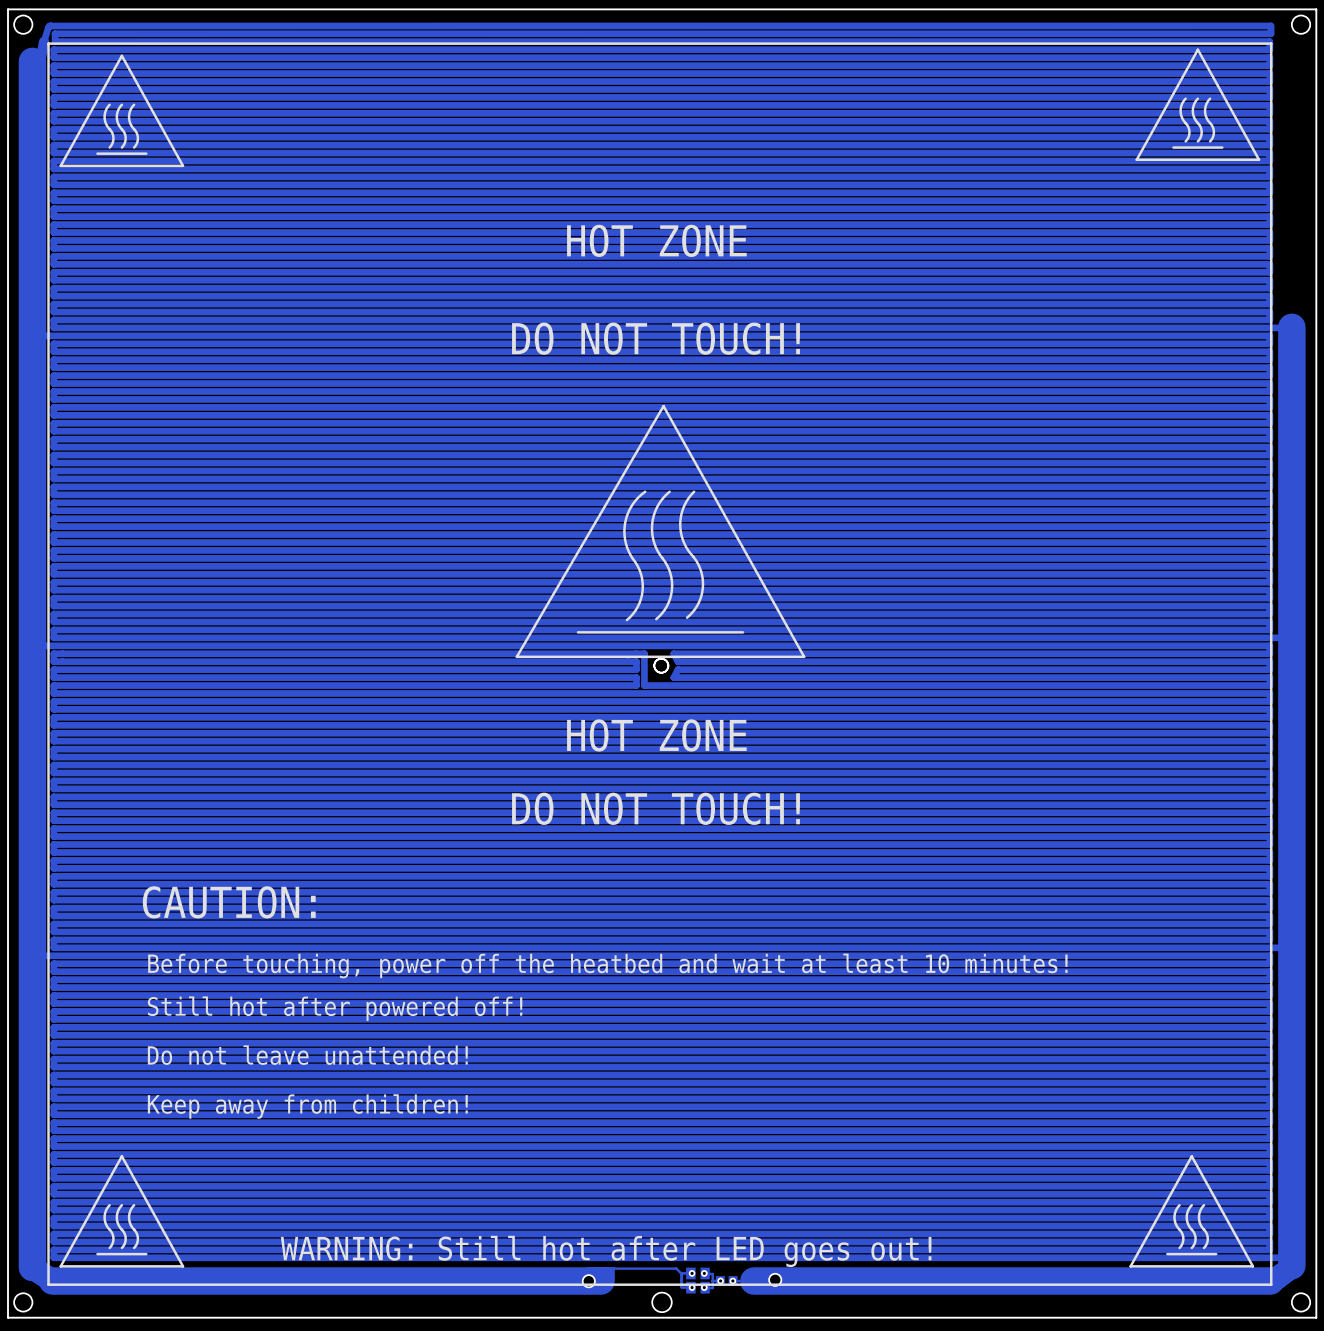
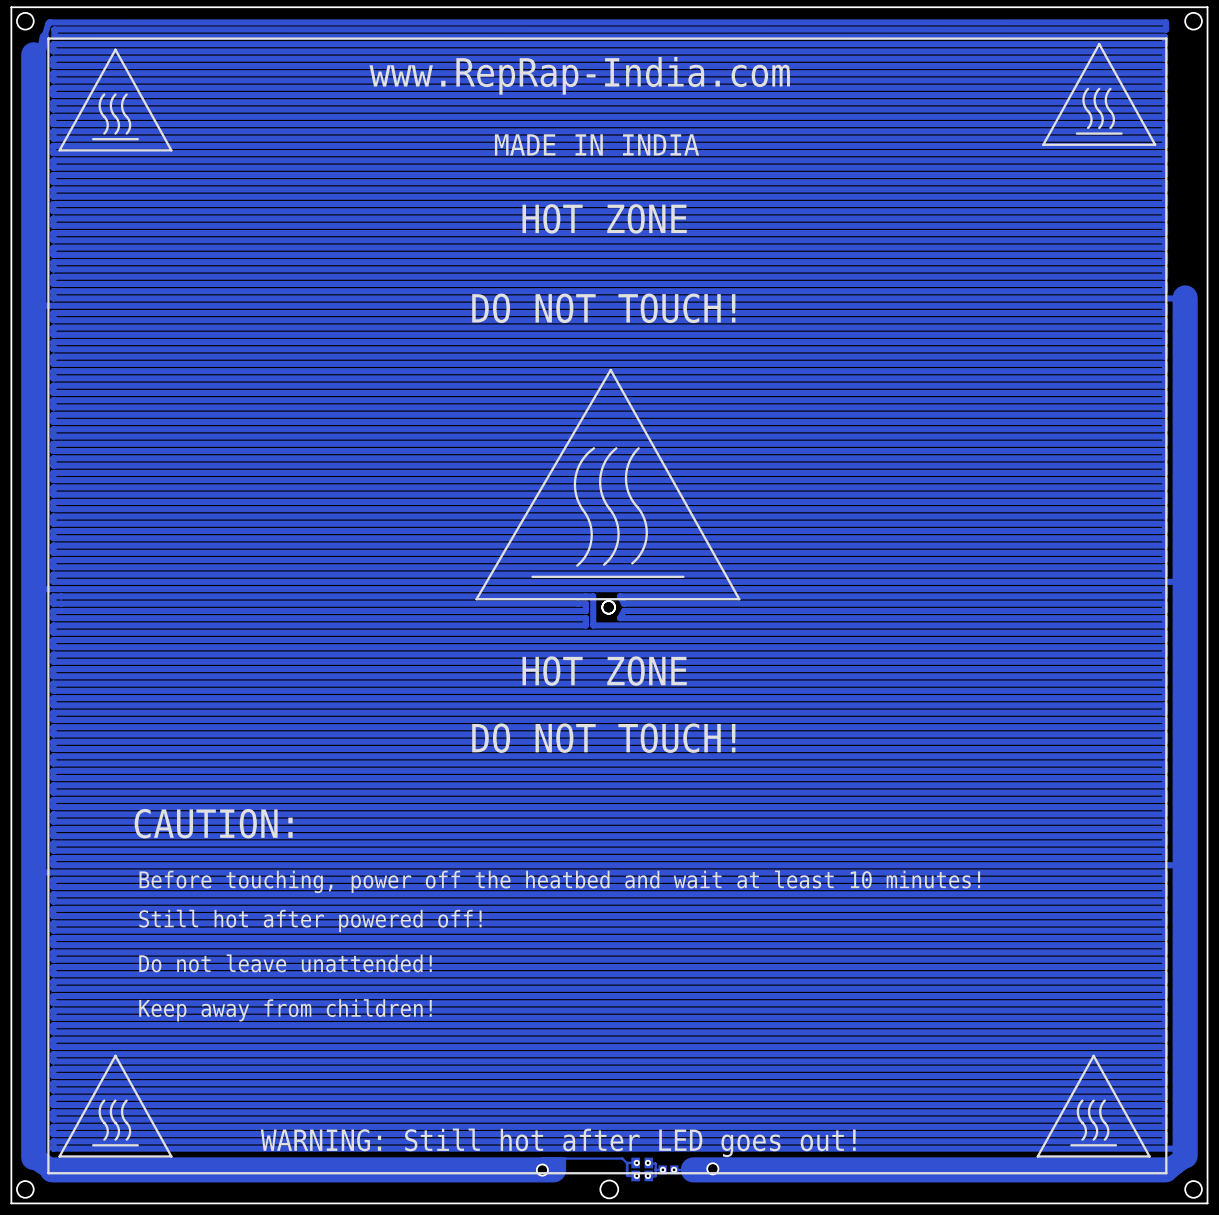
text: none -> www.RepRap-India.com (579, 75)
text: none -> MADE IN INDIA (597, 144)

